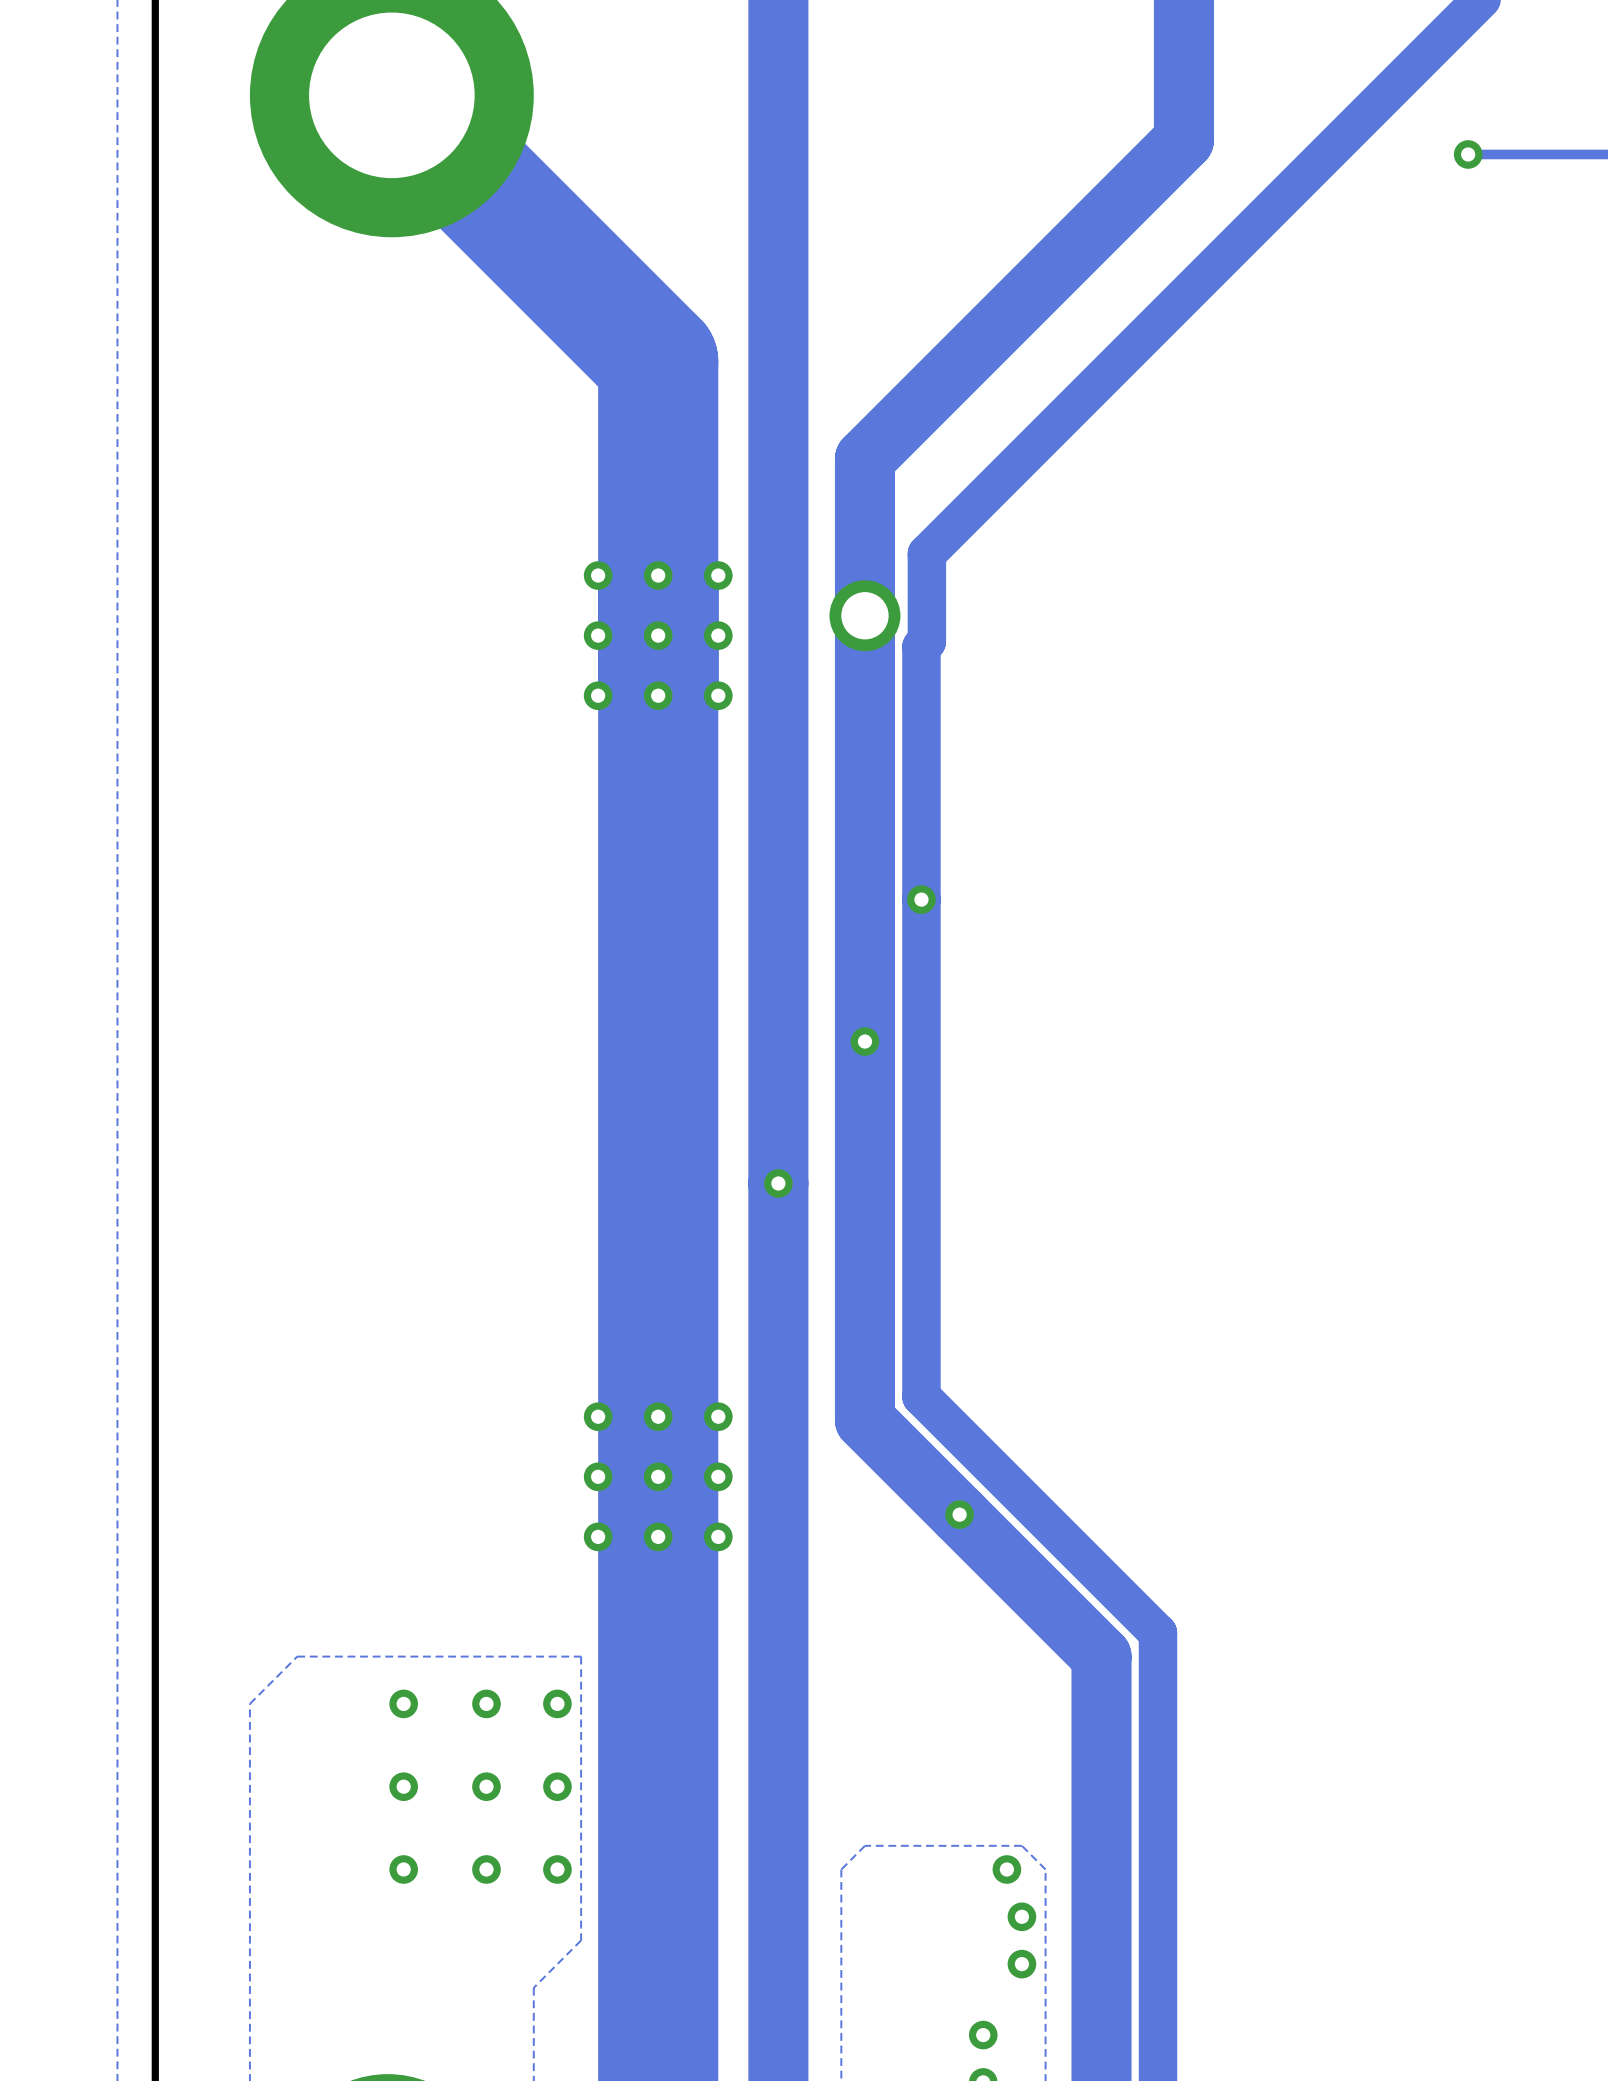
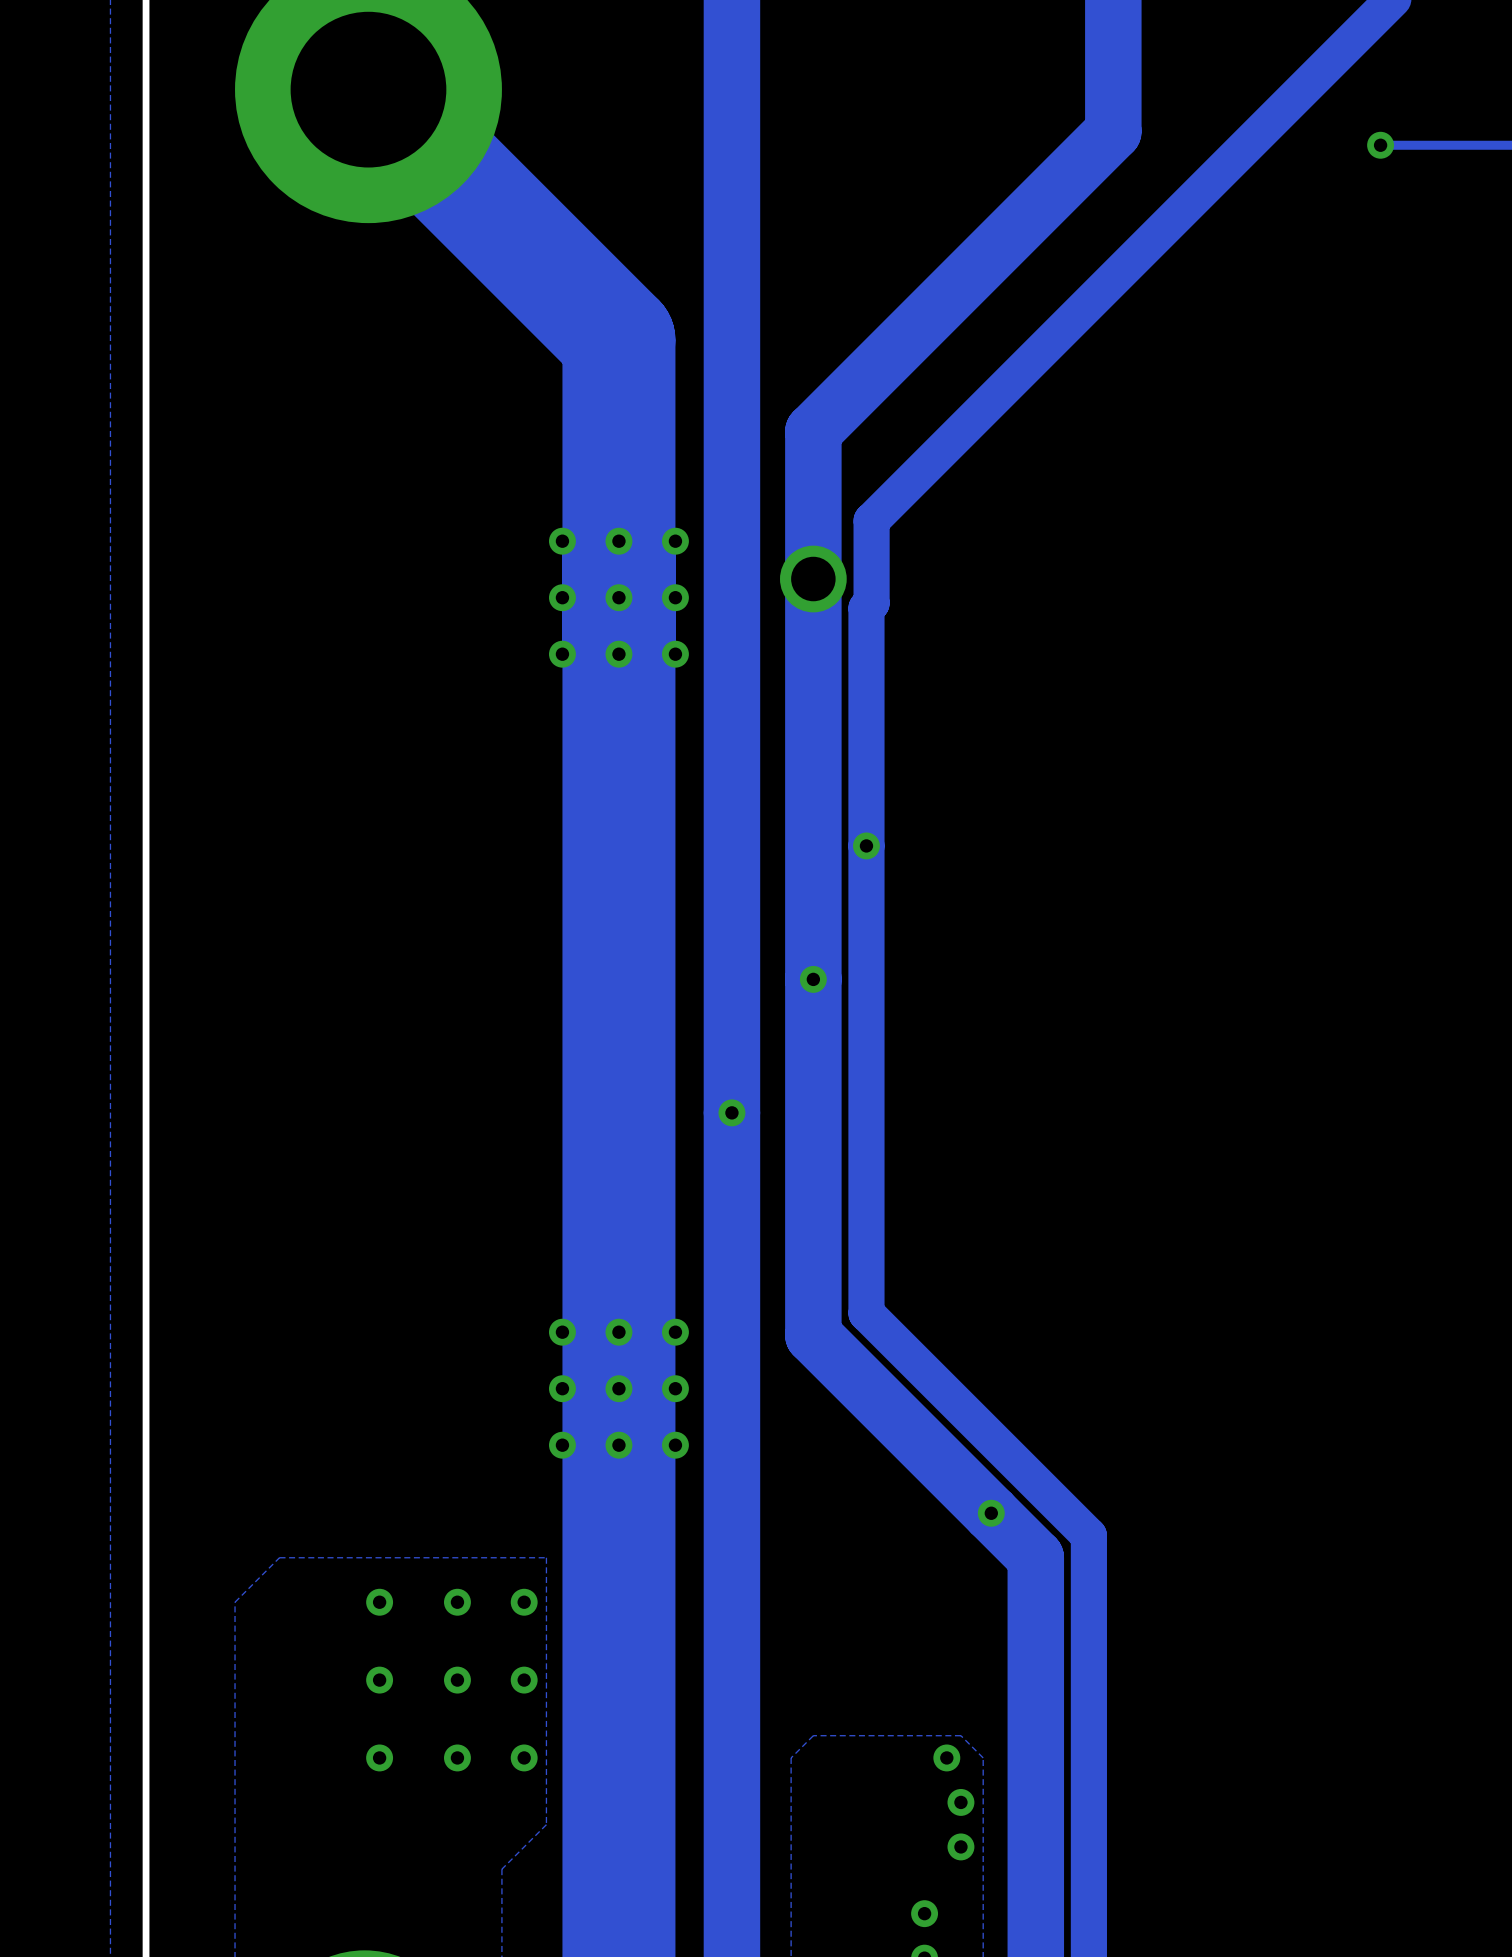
via position: (959, 1514) -> (991, 1513)

